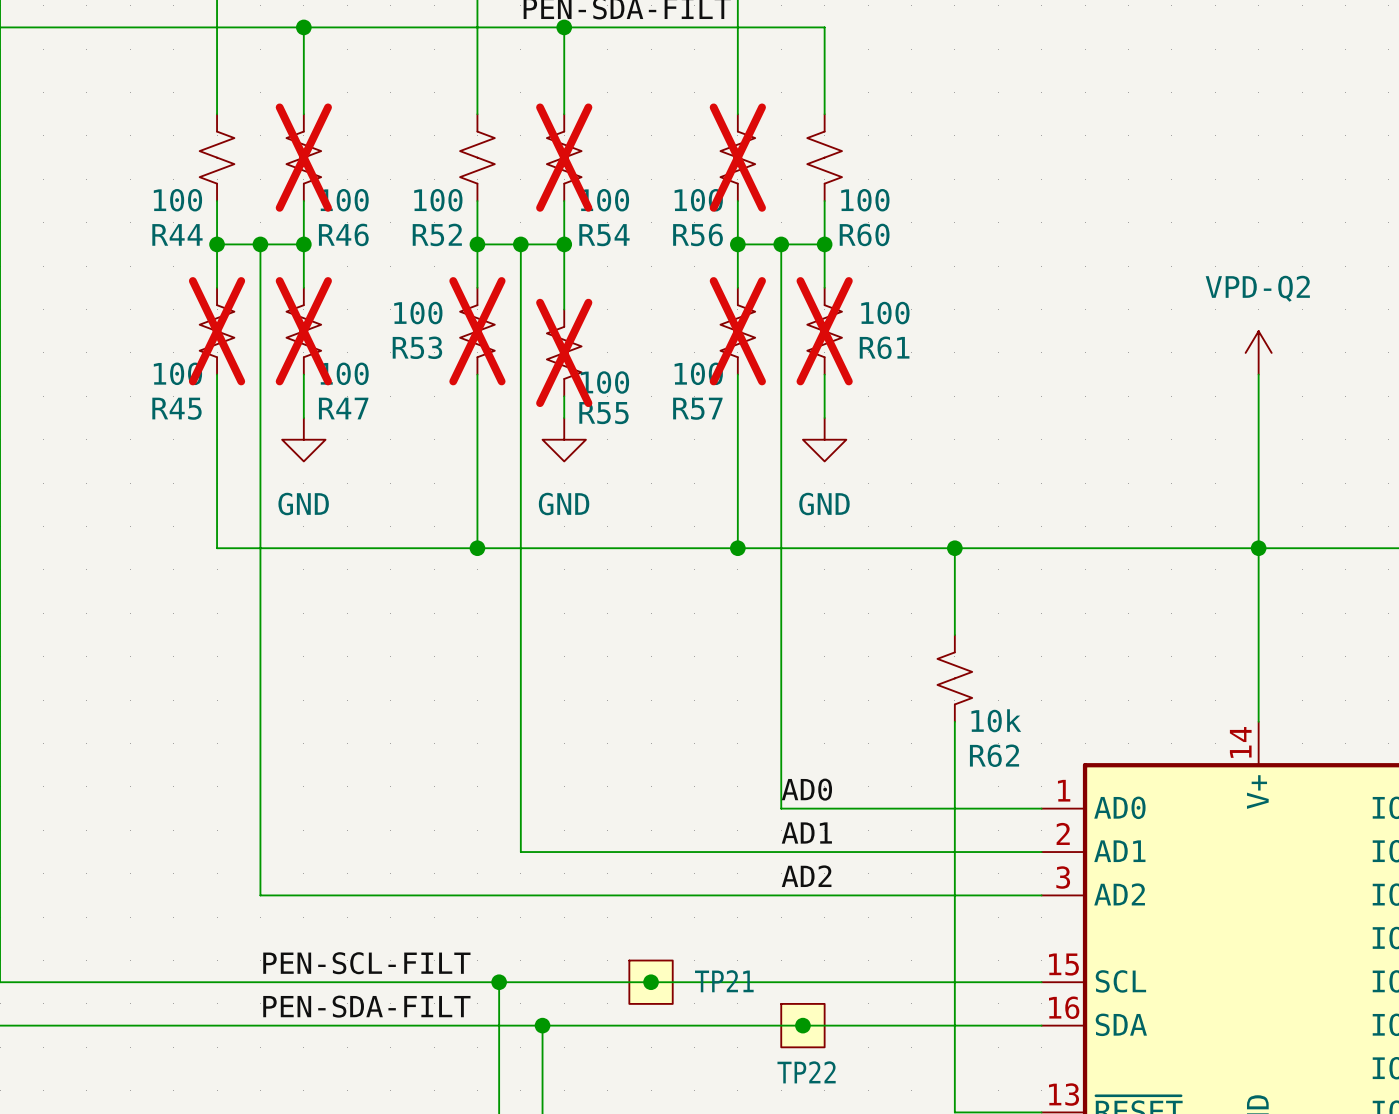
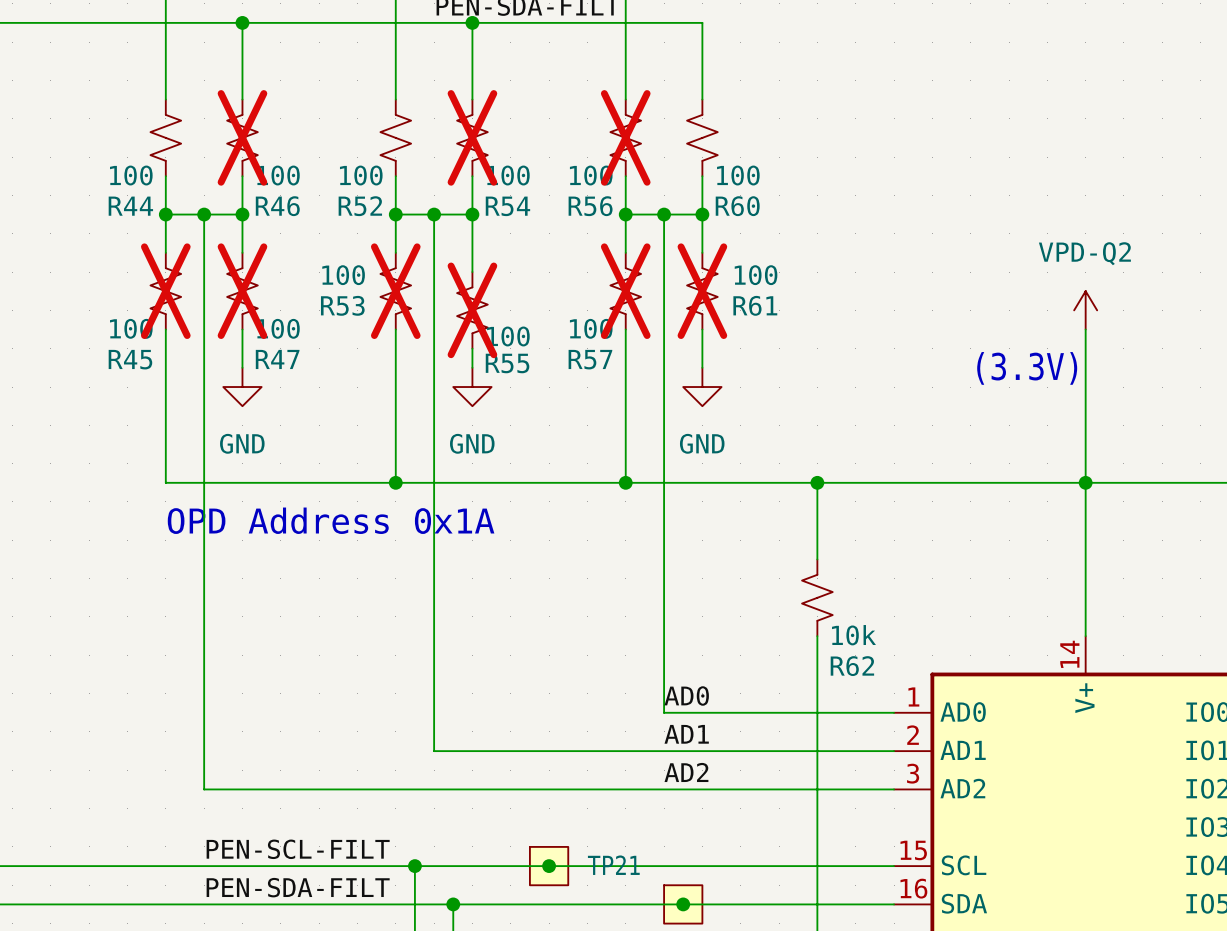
text: none -> (3.3V) (1027, 368)
text: none -> OPD Address 0x1A (331, 520)

